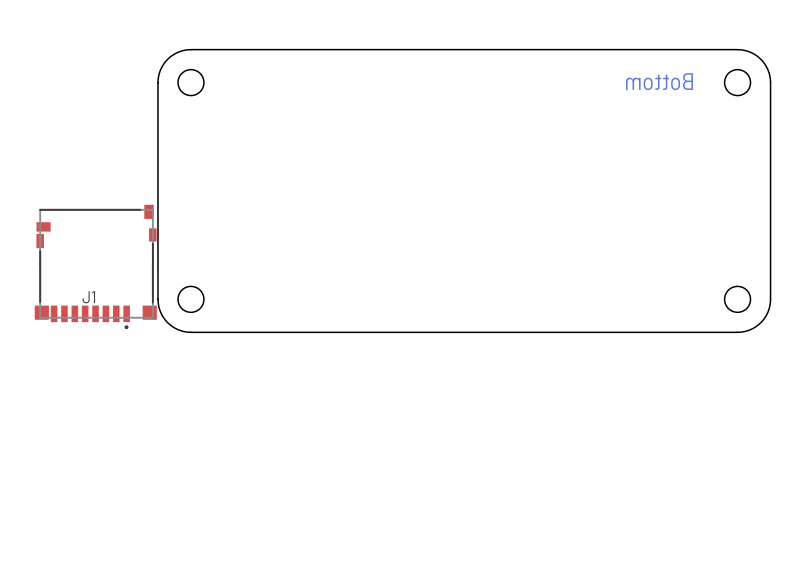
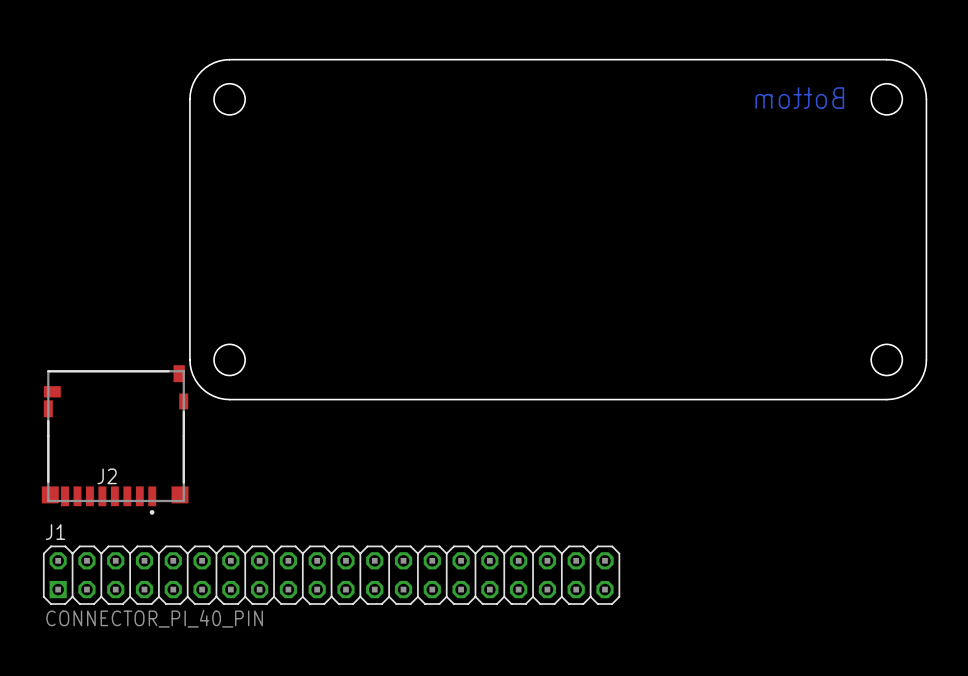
J1 footprint: [34, 204, 157, 330] -> [42, 545, 621, 605]
J1 name position: J1 (88, 297) -> J1 (55, 532)
J2: none -> (115, 439)
J1 value: none -> CONNECTOR_PI_40_PIN (154, 618)

